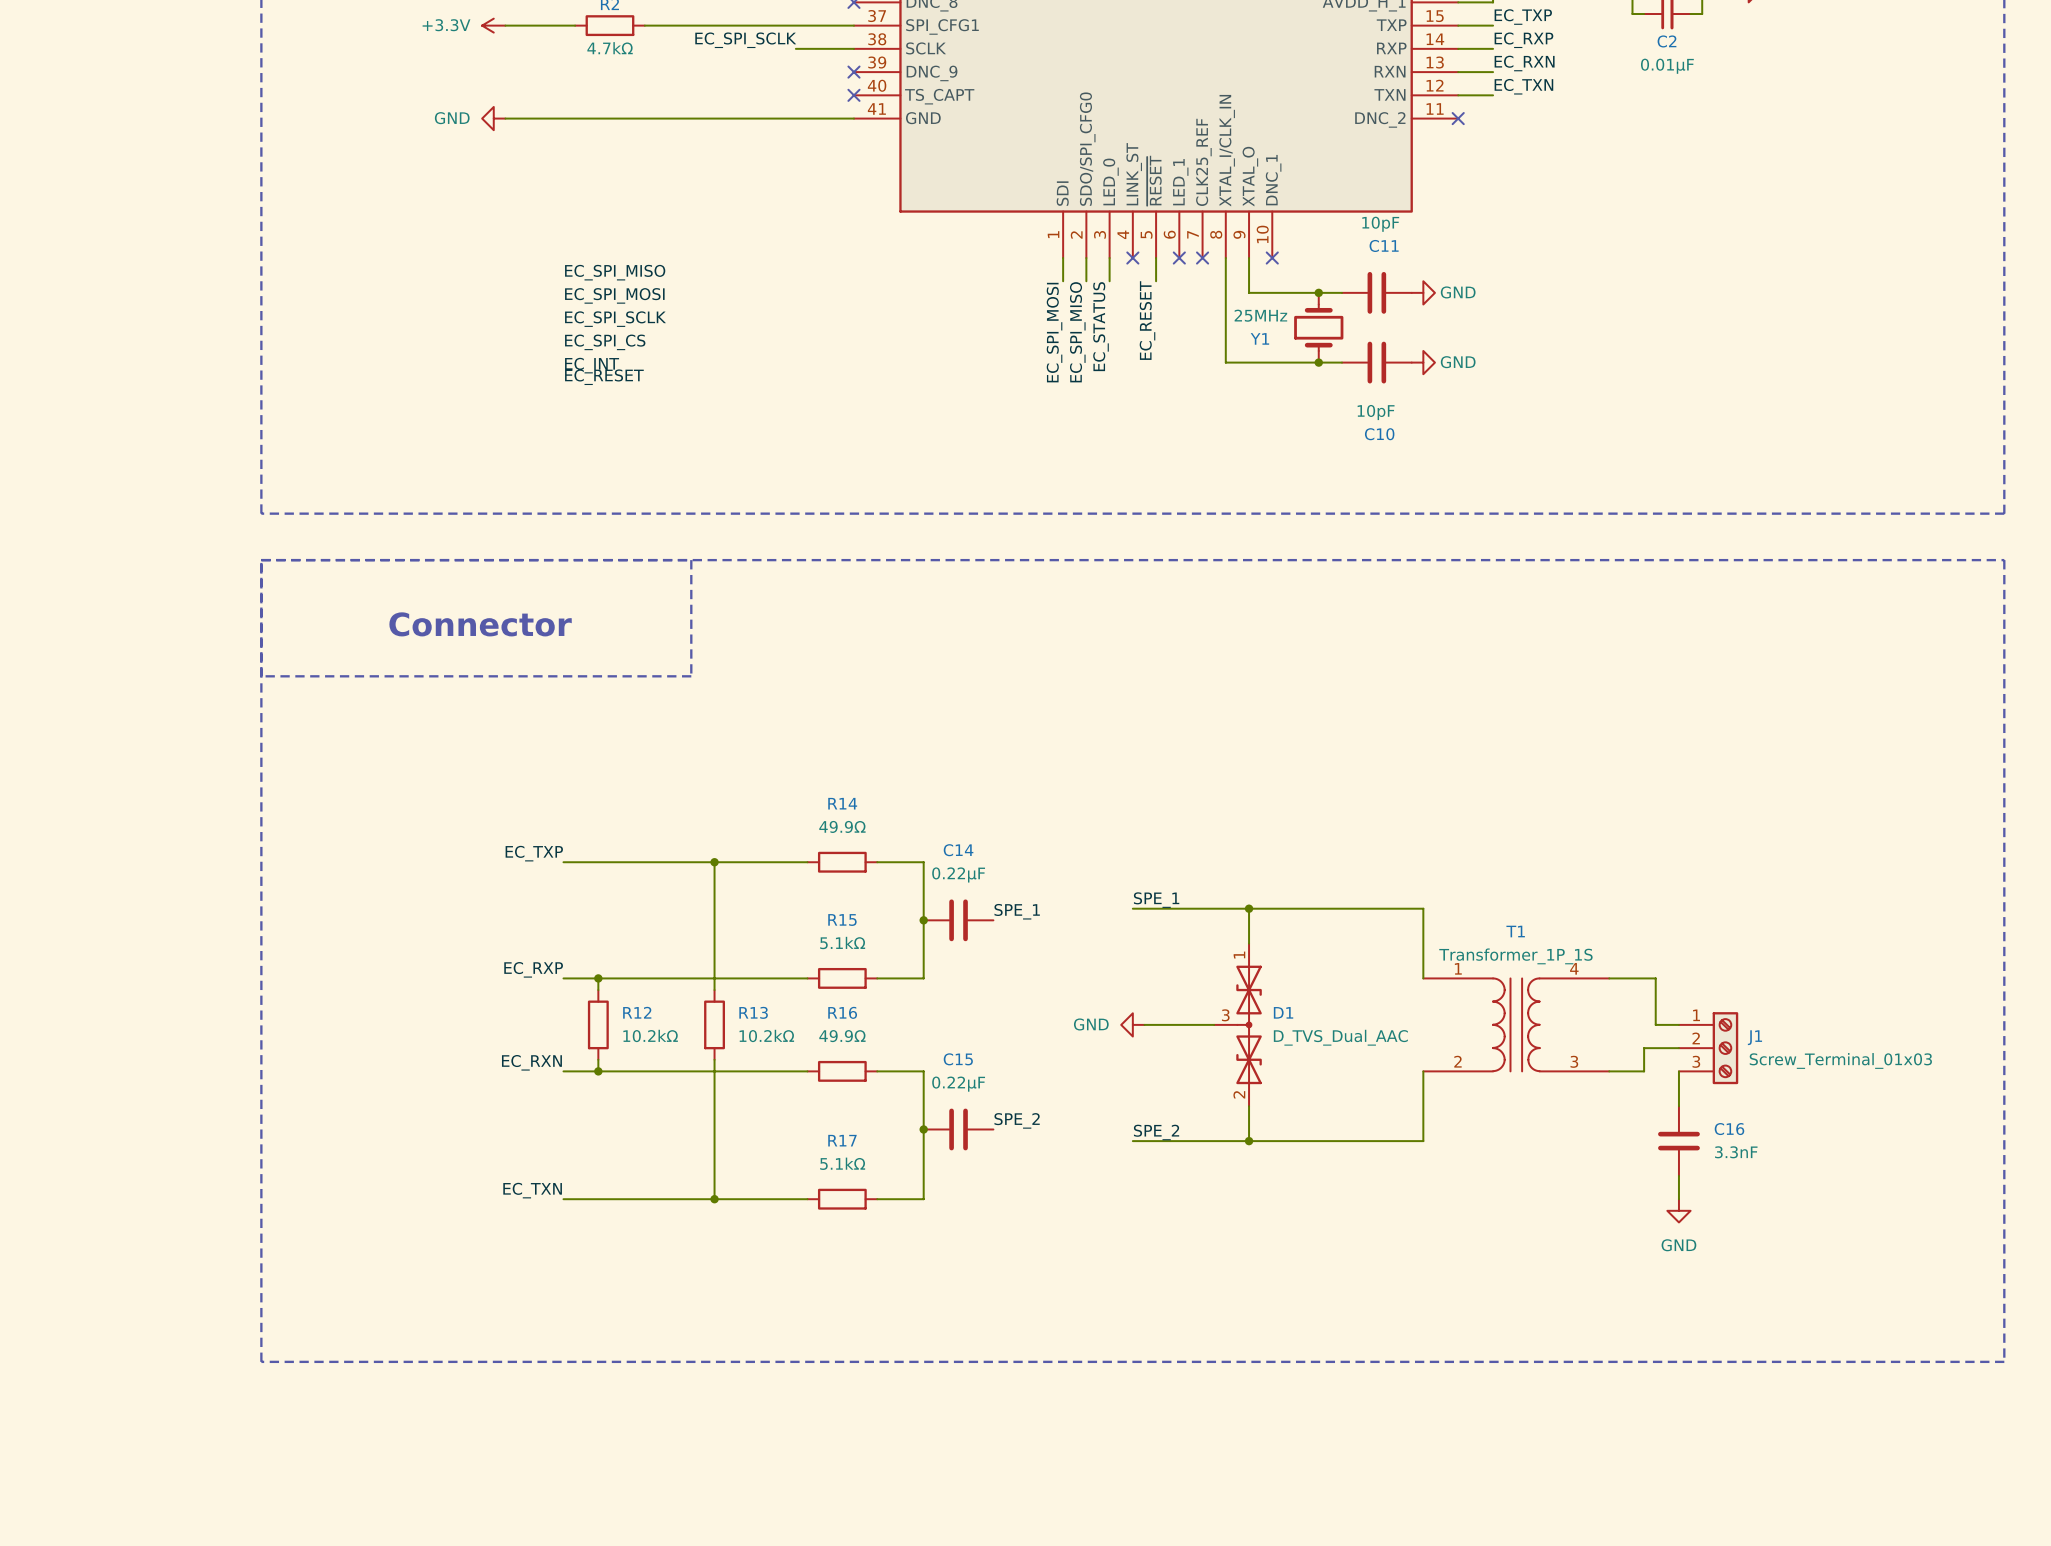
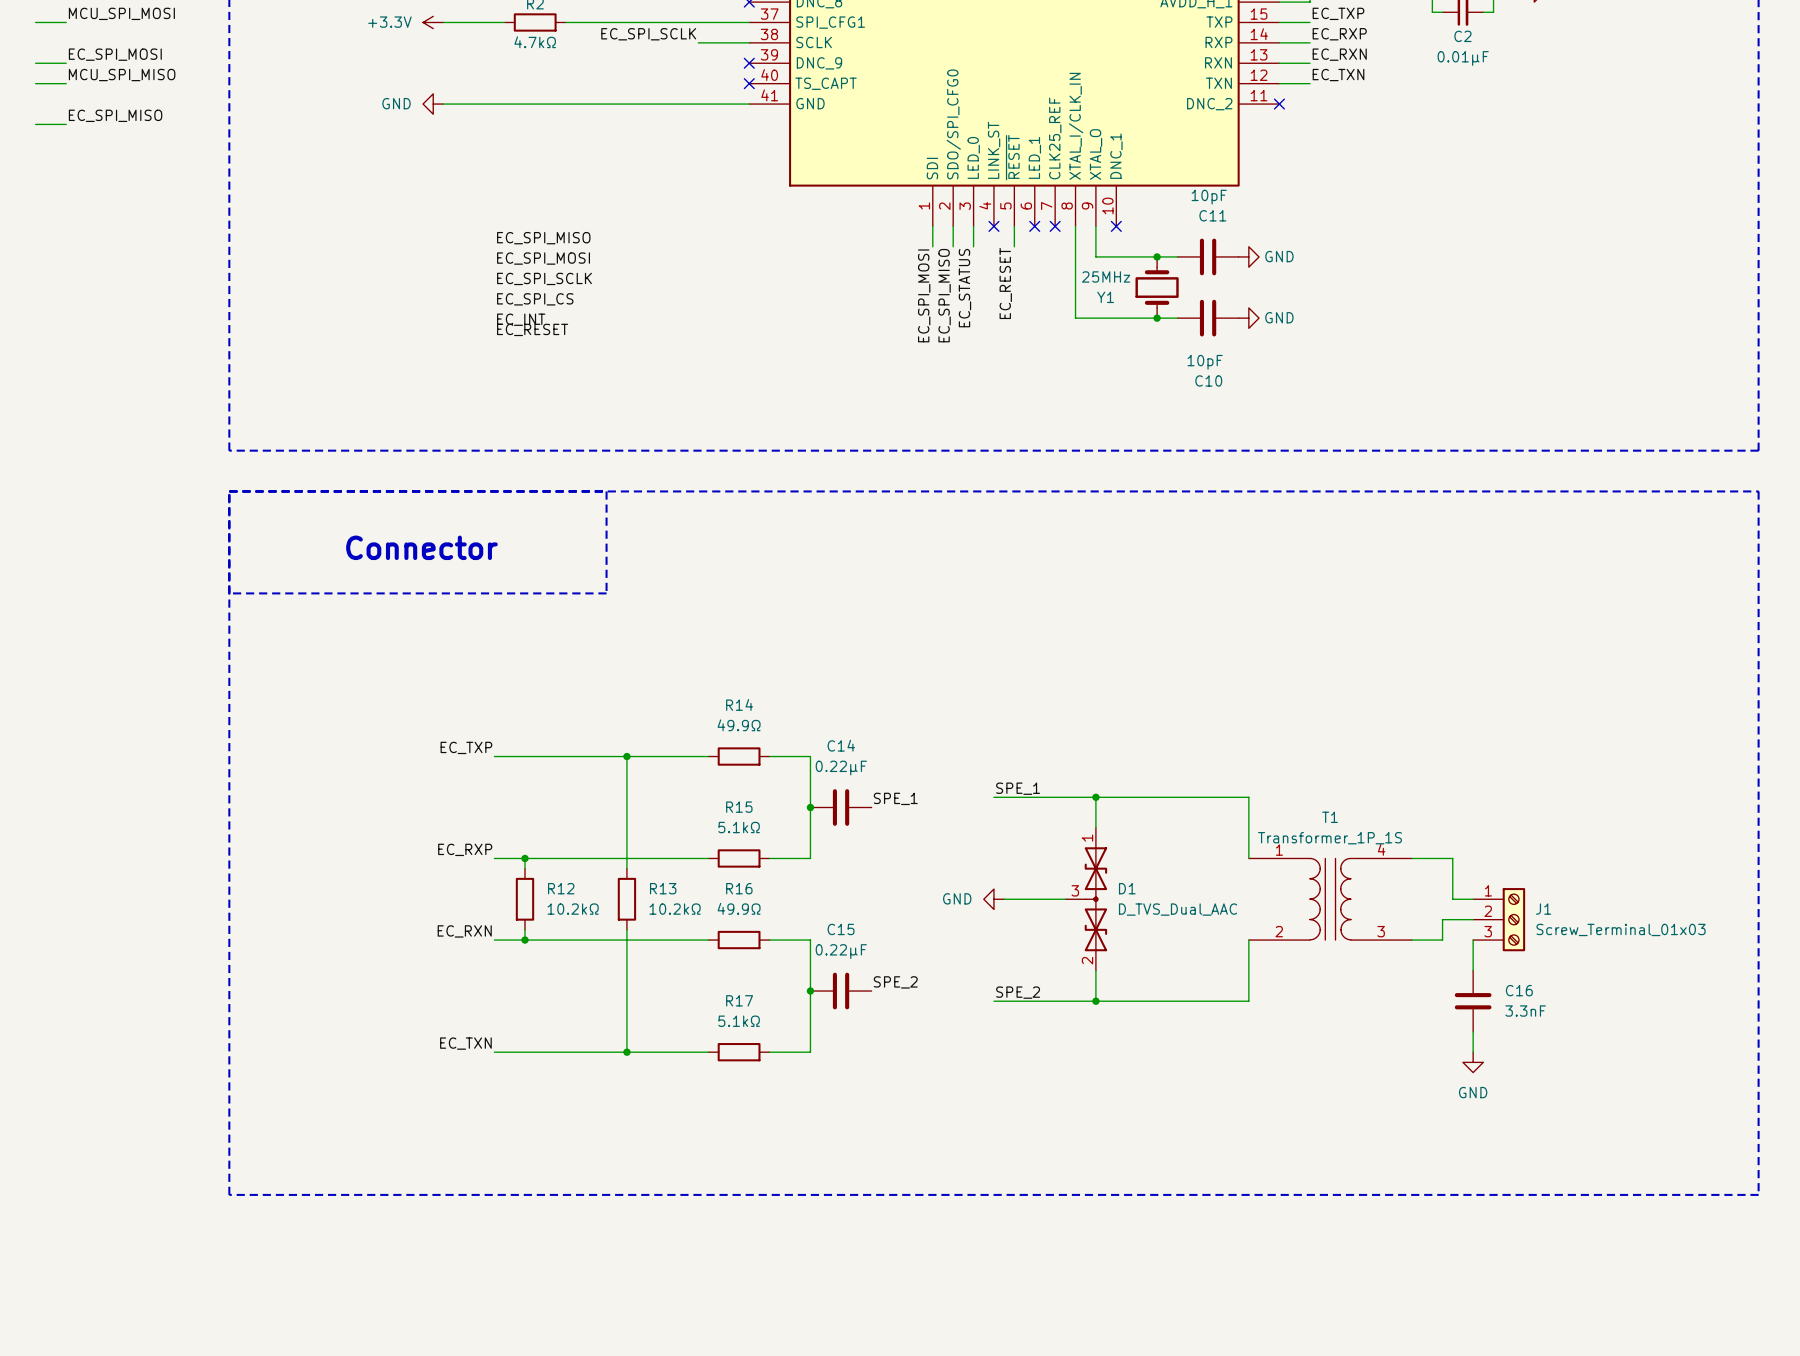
label: none -> MCU_SPI_MOSI (121, 13)
wire: none -> (35, 22) (66, 22)
label: none -> EC_SPI_MOSI (115, 54)
wire: none -> (35, 63) (66, 63)
label: none -> MCU_SPI_MISO (122, 75)
wire: none -> (35, 83) (66, 83)
label: none -> EC_SPI_MISO (115, 115)
wire: none -> (35, 124) (66, 124)

